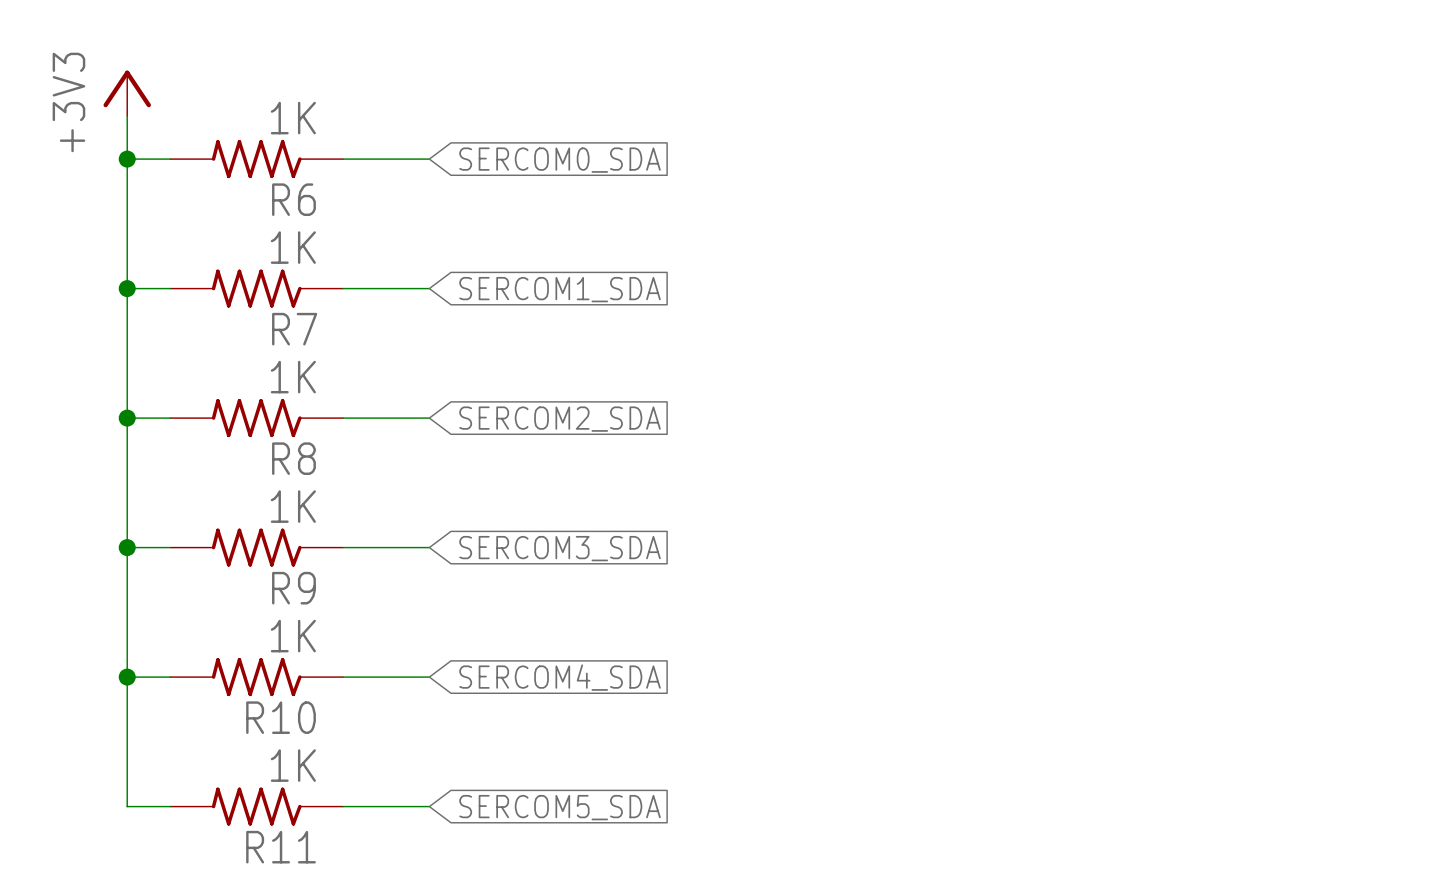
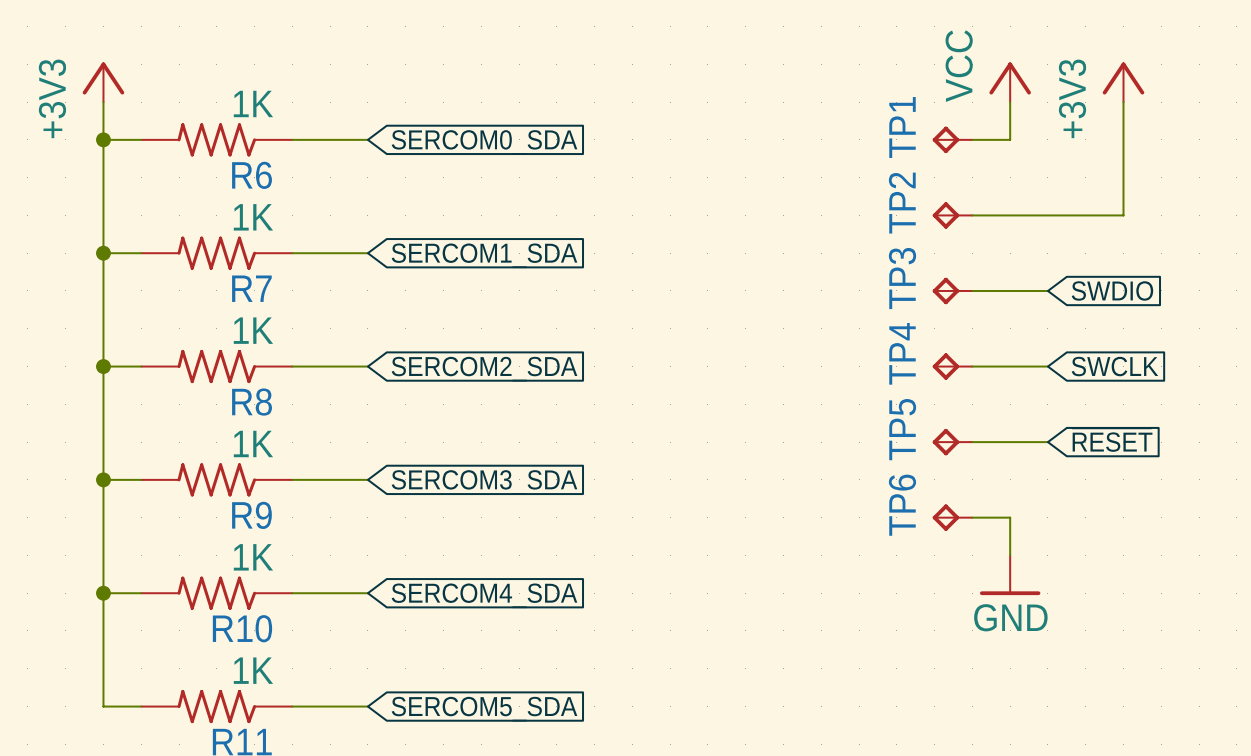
power symbol: none -> VCC (1010, 82)
power symbol: none -> +3V3 (1123, 82)
wire: none -> (1010, 102) (1010, 139) (972, 139)
wire: none -> (1123, 102) (1123, 215) (972, 215)
TP1: none -> (952, 139)
TP2: none -> (952, 215)
TP3: none -> (952, 290)
wire: none -> (972, 290) (1047, 290)
global label: none -> SWDIO (1112, 290)
TP4: none -> (952, 366)
wire: none -> (972, 366) (1047, 366)
global label: none -> SWCLK (1114, 366)
global label: none -> ~{RESET} (1112, 440)
TP5: none -> (952, 442)
wire: none -> (972, 442) (1047, 442)
TP6: none -> (952, 517)
wire: none -> (972, 517) (1010, 517) (1010, 555)
power symbol: none -> GND (1010, 575)

